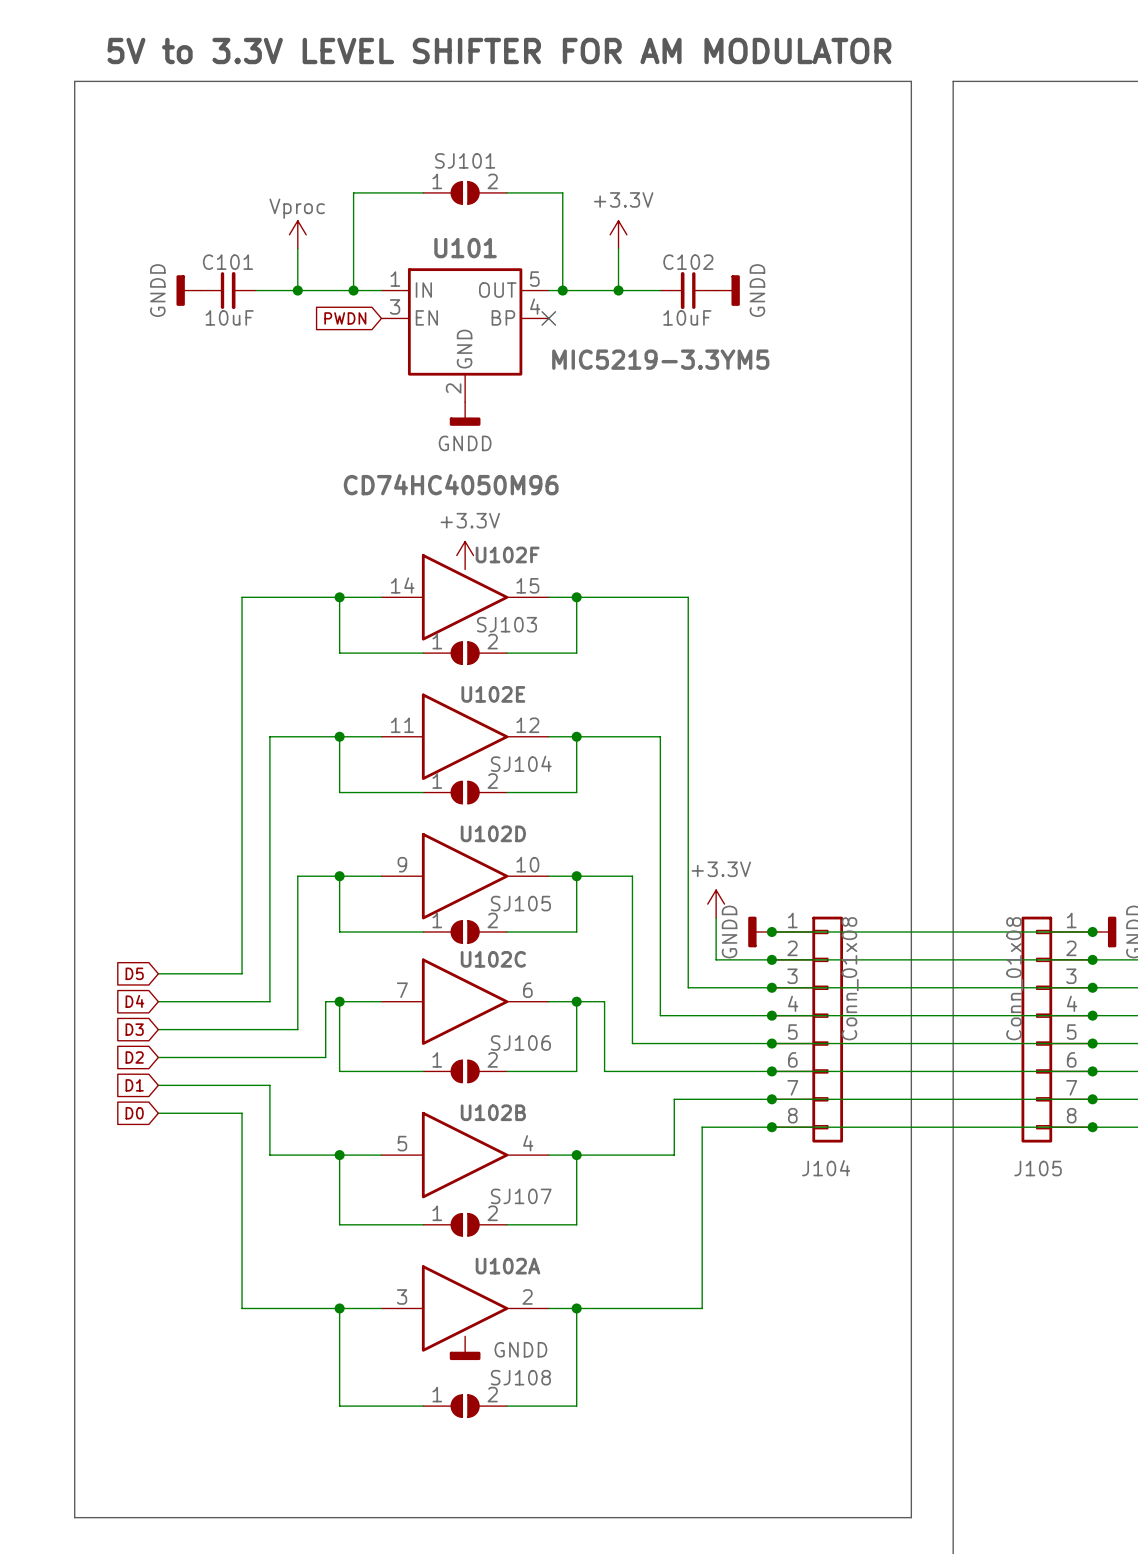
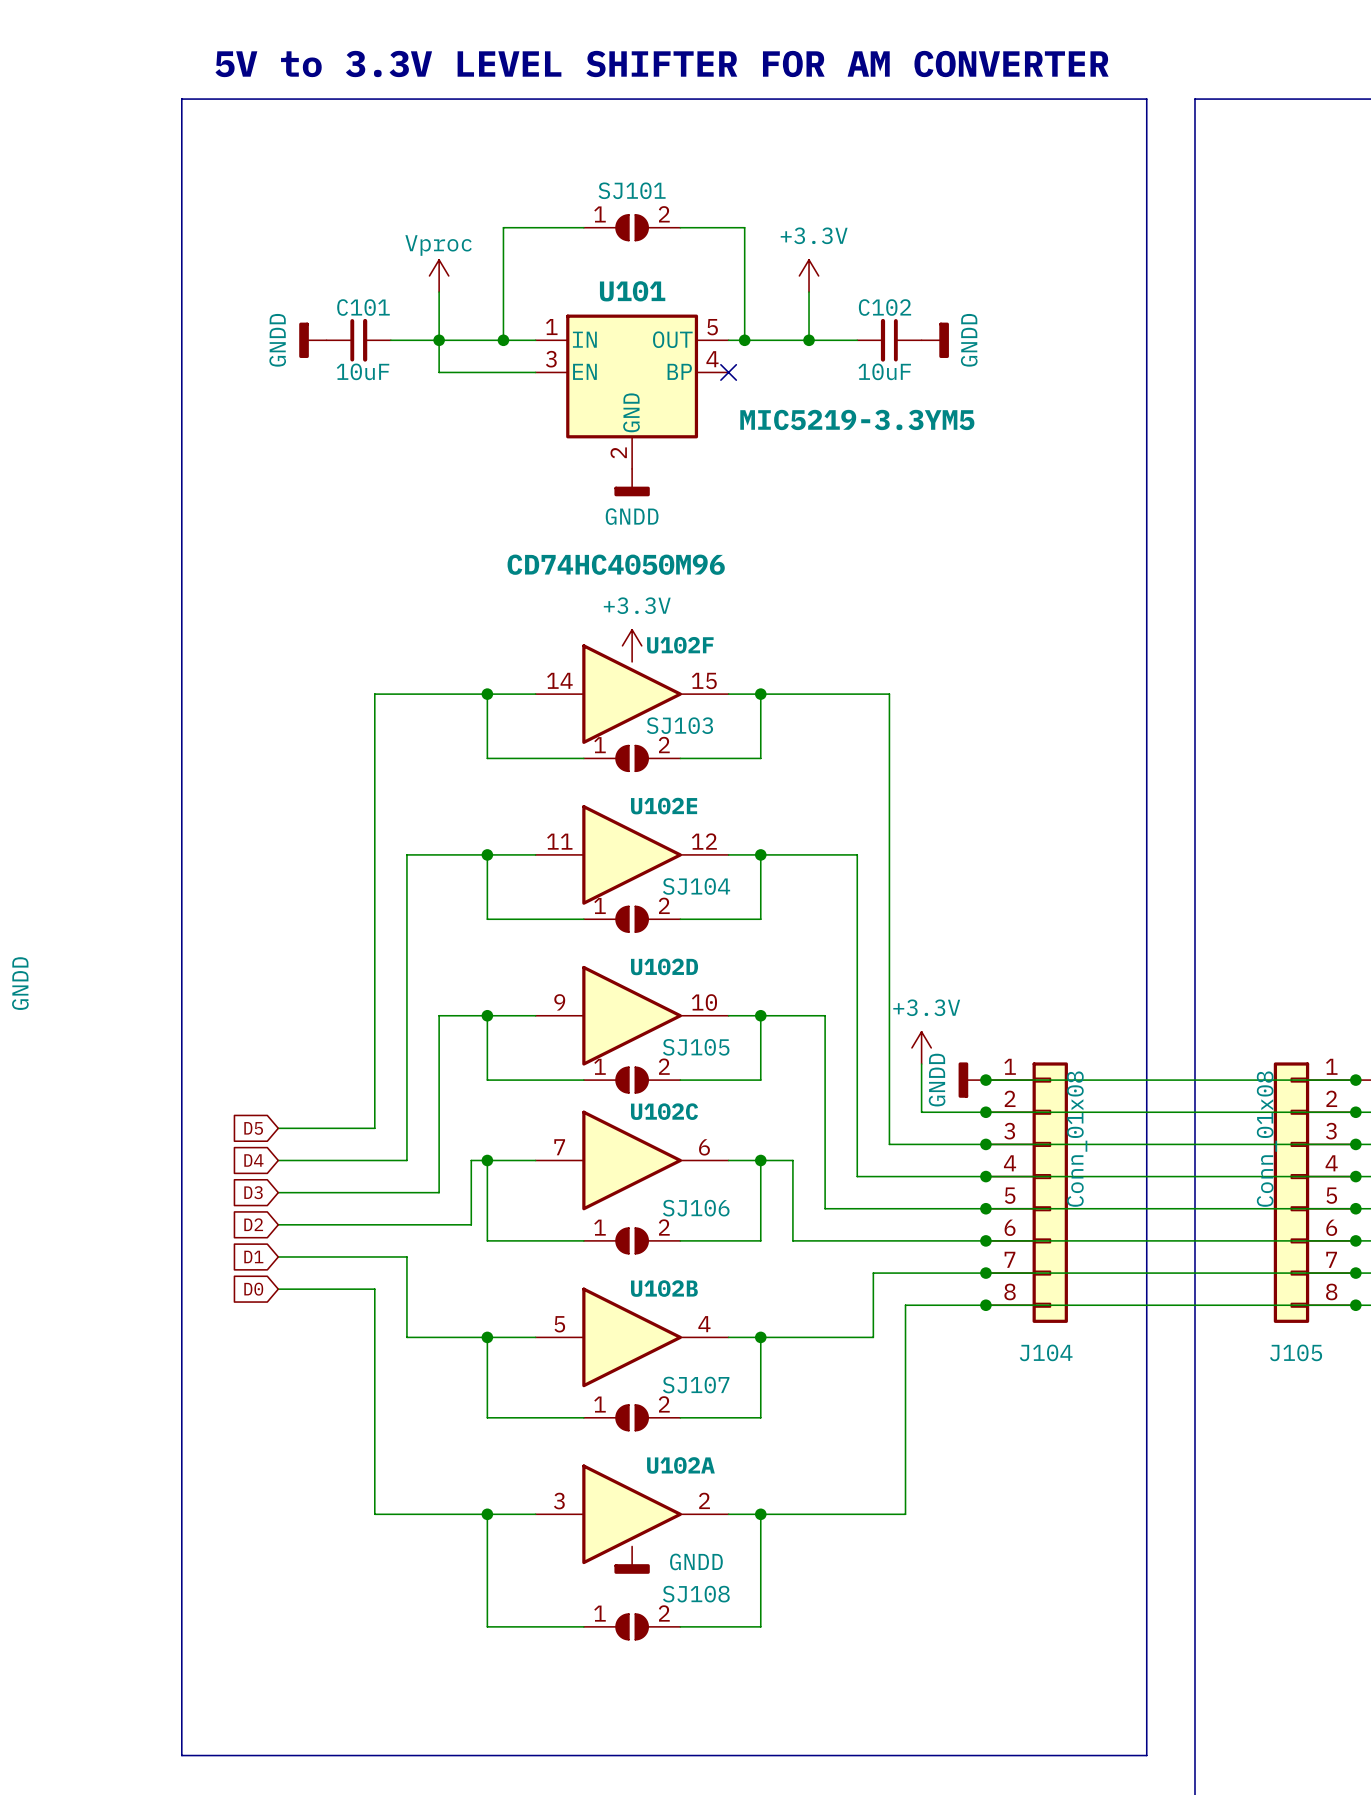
text: 5V to 3.3V LEVEL SHIFTER FOR AM MODULATOR (499, 50) -> 5V to 3.3V LEVEL SHIFTER FOR AM CONVERTER (662, 63)
wire: none -> (439, 340) (439, 372) (535, 372)
global label: PWDN (345, 318) -> none

